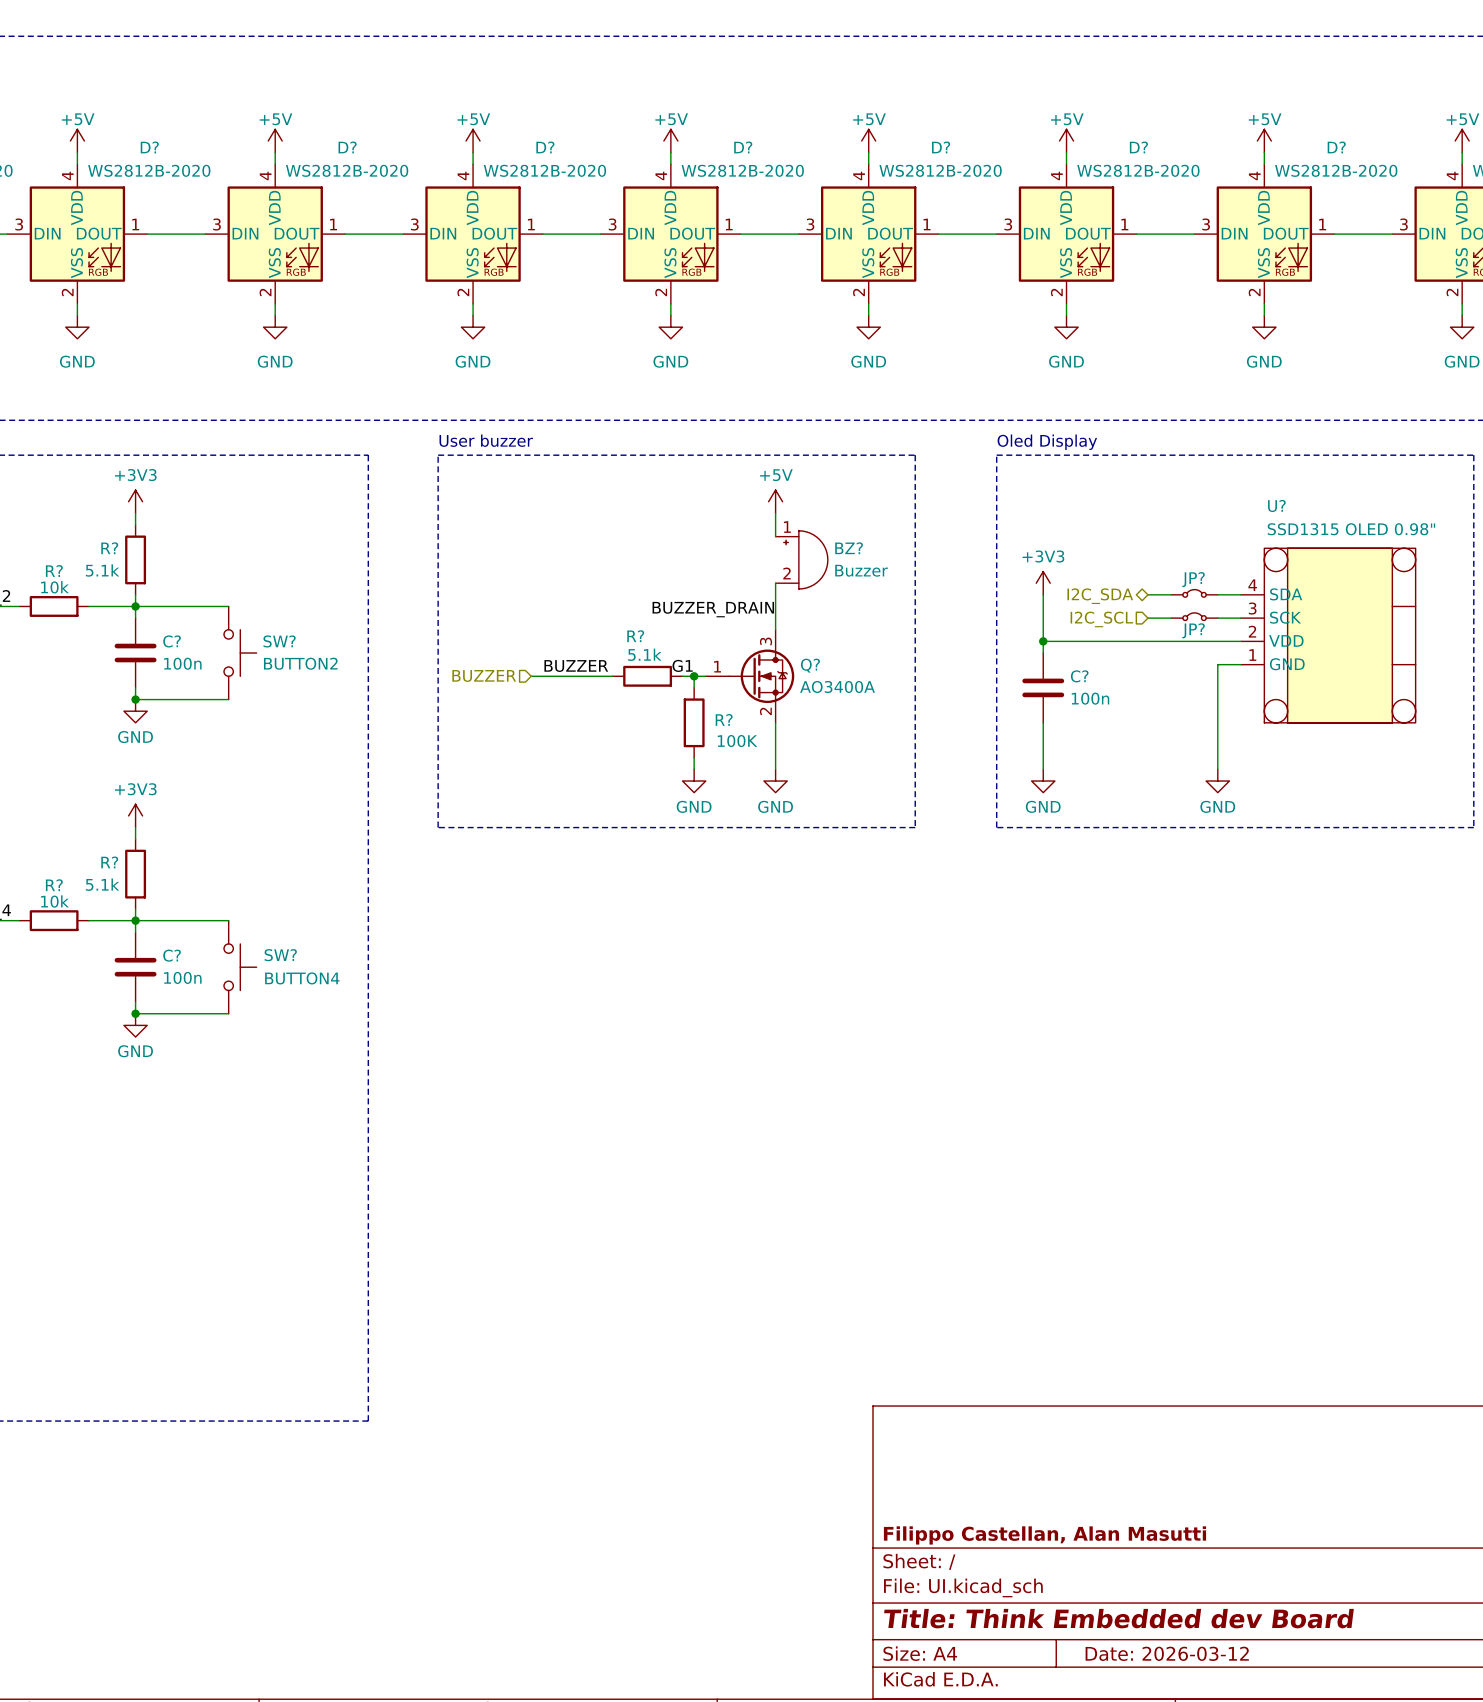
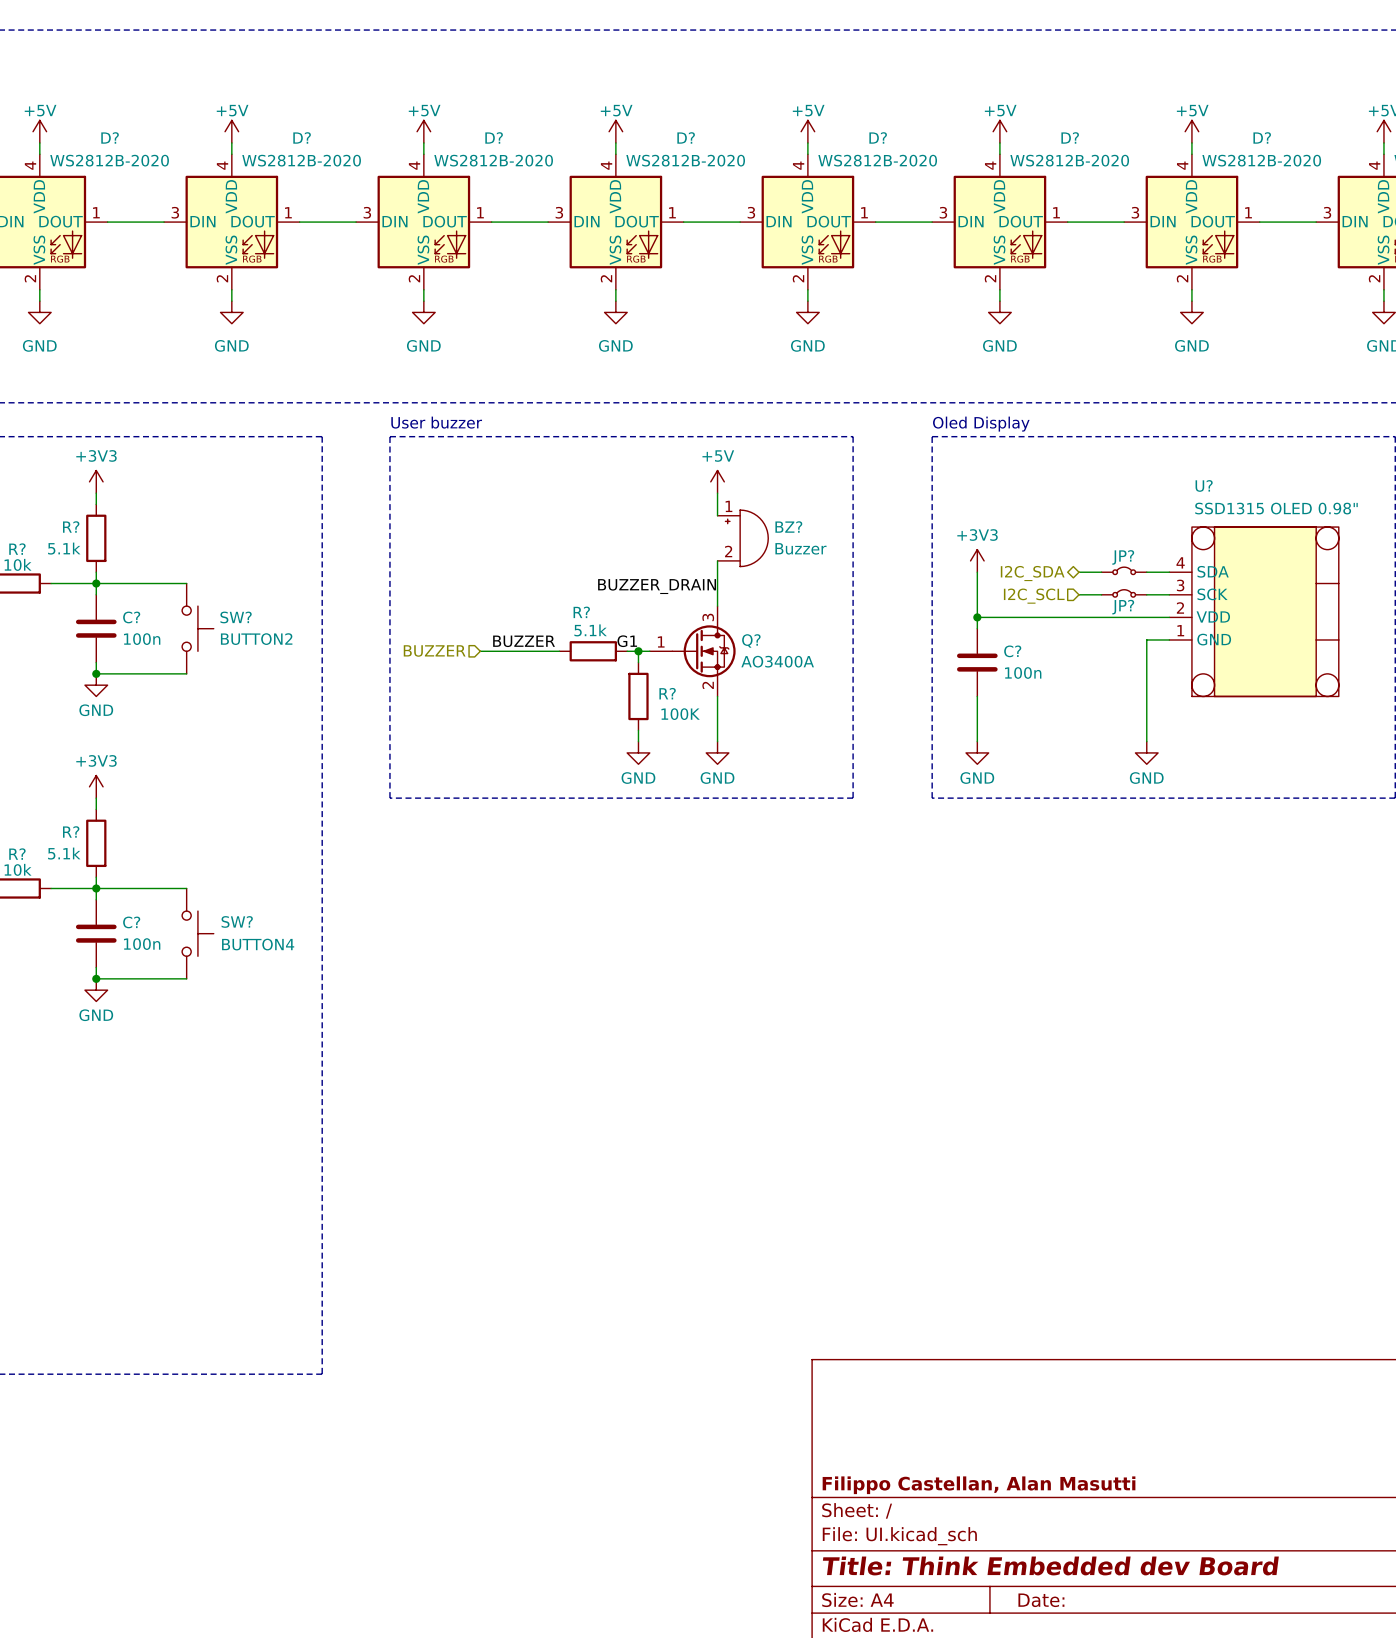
title block: Date: 2026-03-12 (1167, 1653) -> Date: (1041, 1600)

